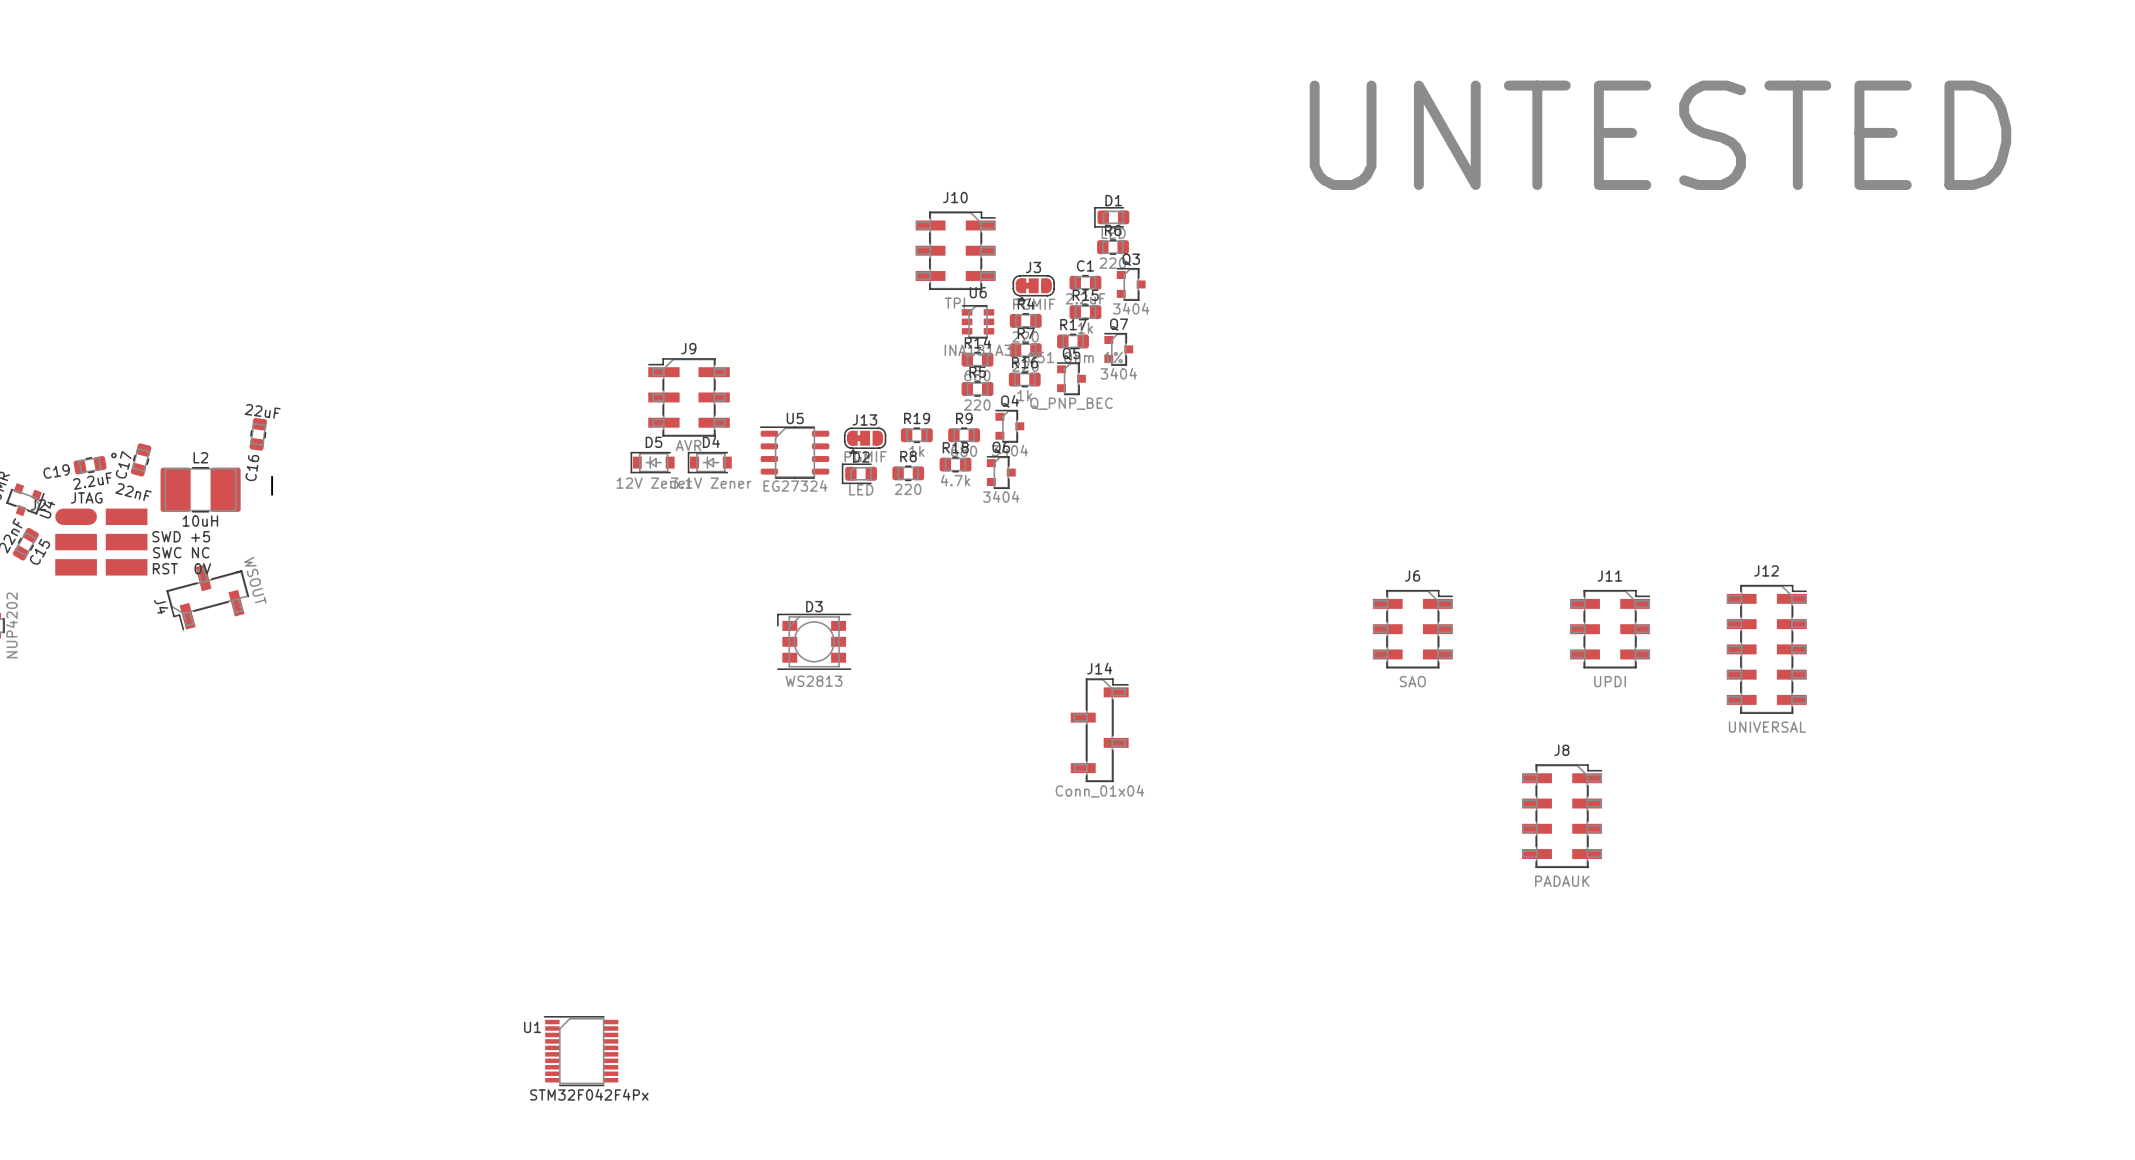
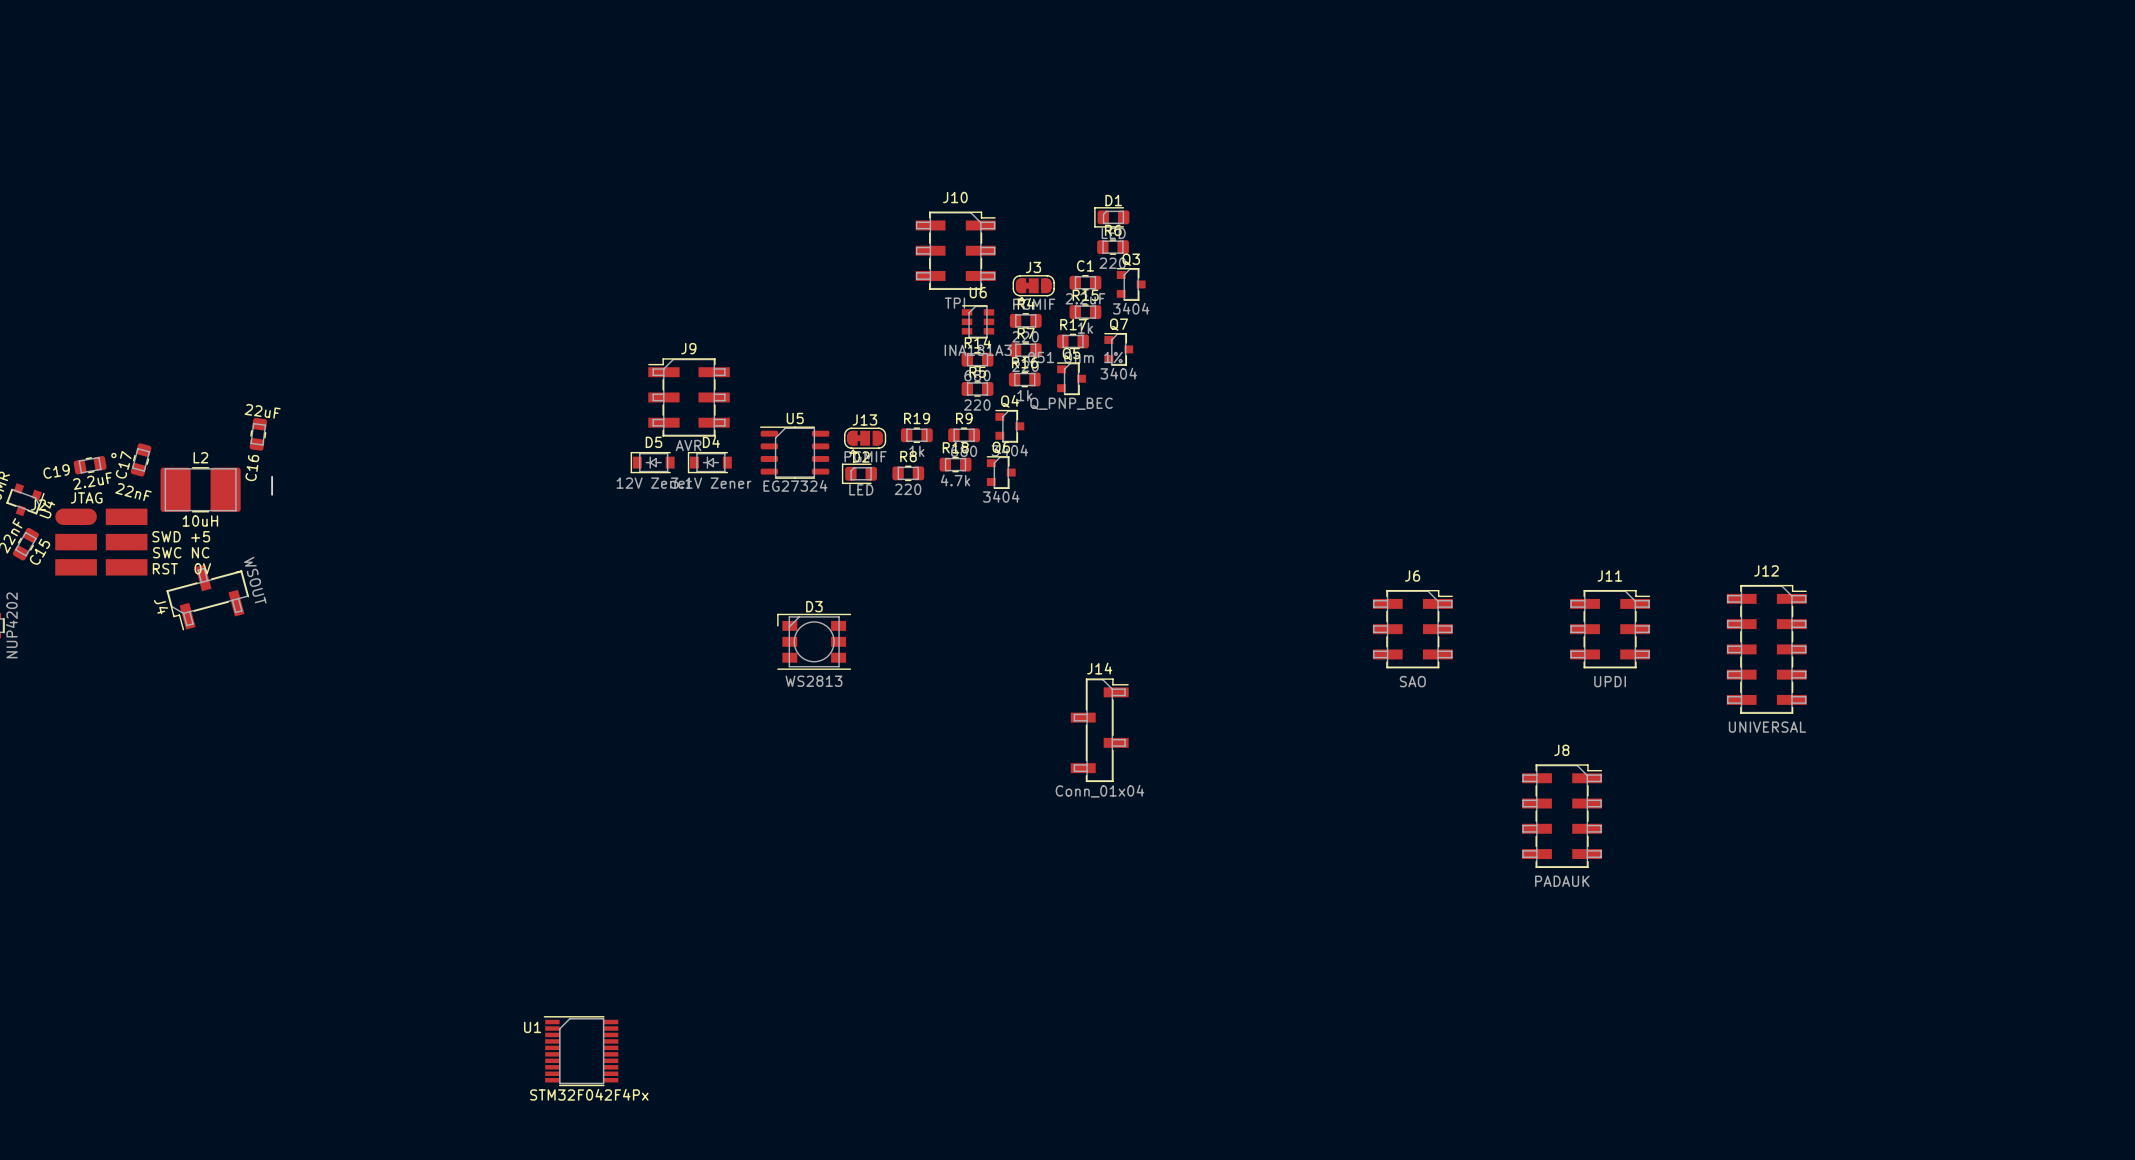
text: UNTESTED (1660, 135) -> none

